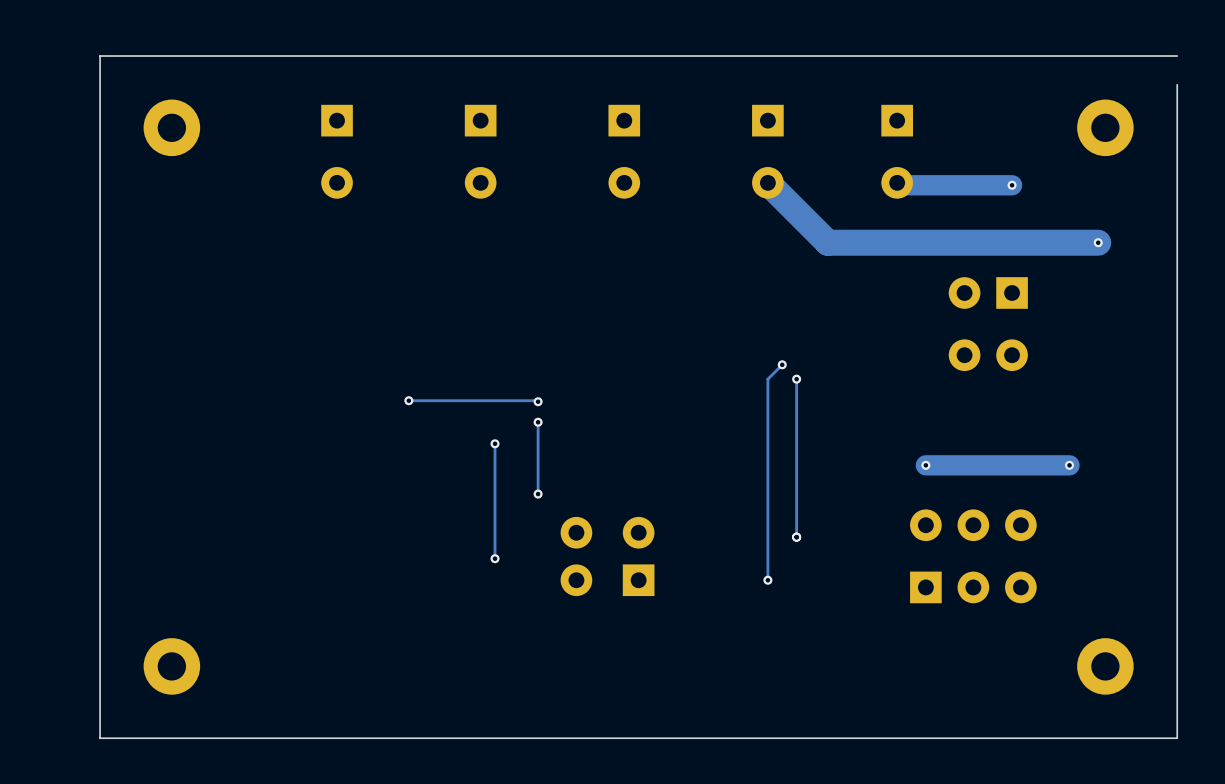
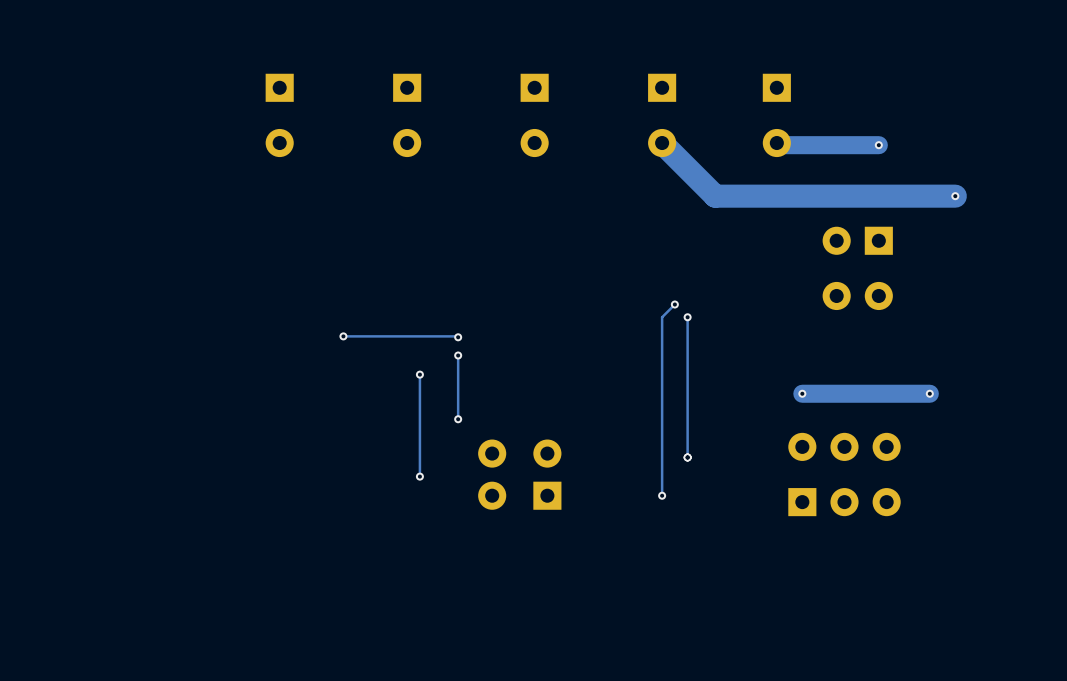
board edge: (1177, 56) (100, 56) (100, 738) (1177, 738) (1177, 84) -> none
part: (171, 127) -> none
part: (1105, 127) -> none
part: (171, 666) -> none
part: (1105, 666) -> none

